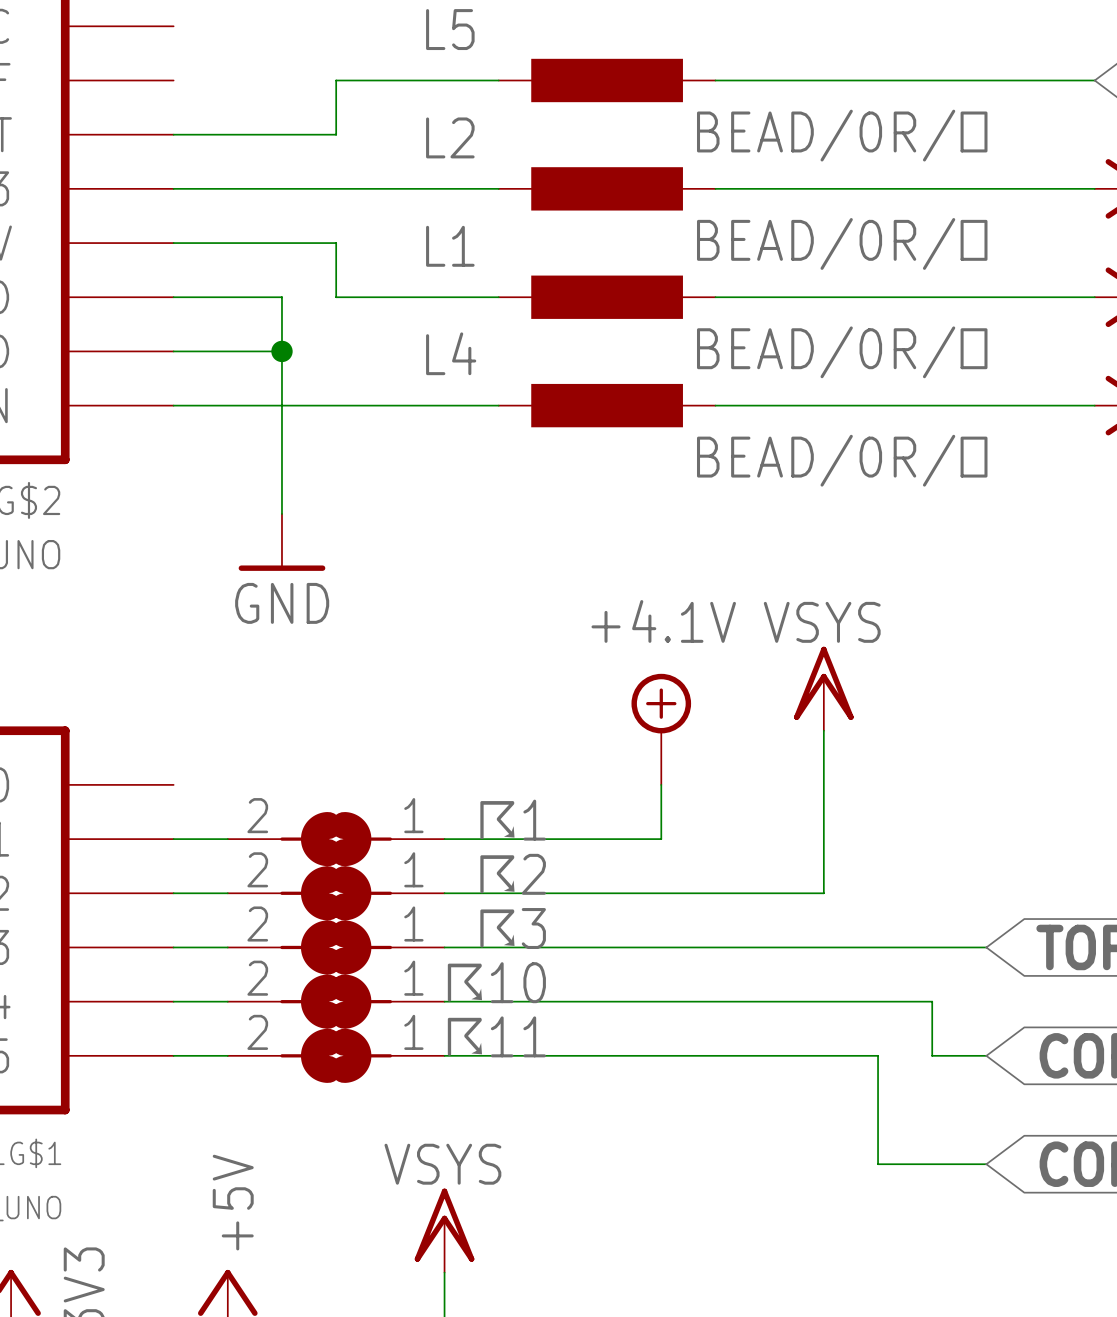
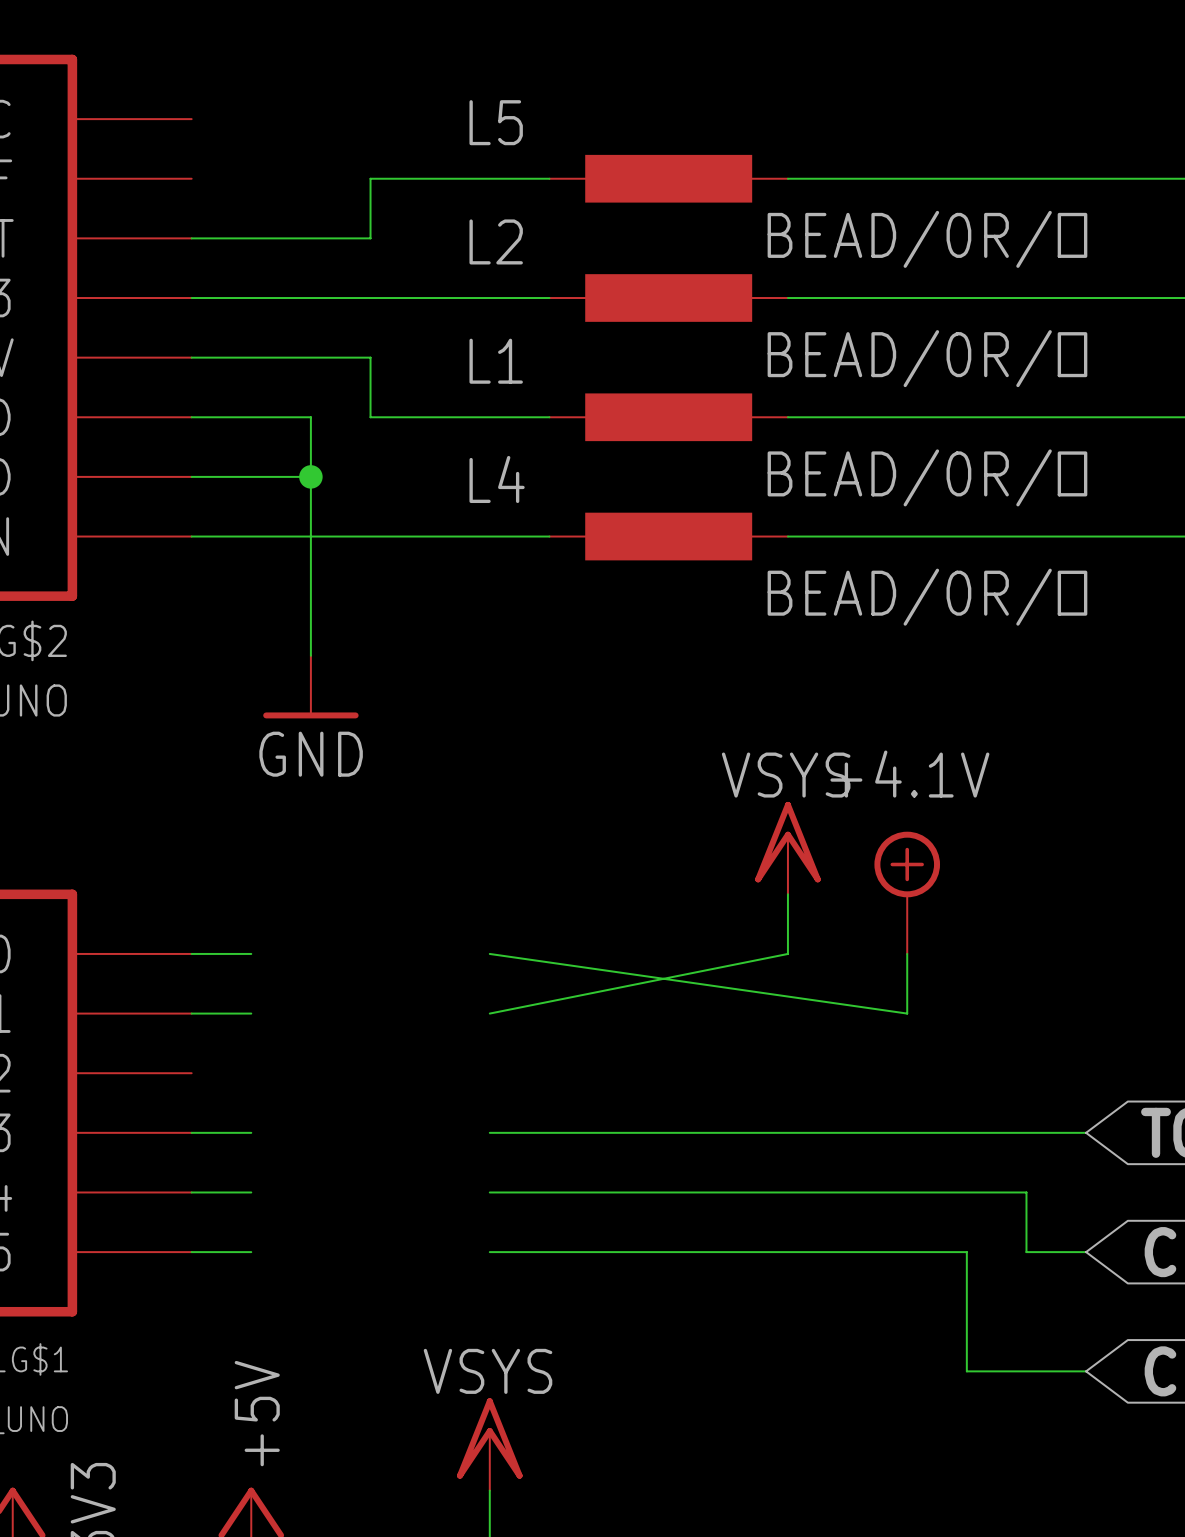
power symbol position: VSYS (823, 688) -> VSYS (787, 848)
power symbol position: +4.1V (661, 729) -> +4.1V (907, 892)
wire: (661, 784) (661, 839) (444, 839) -> (787, 894) (787, 953) (489, 1013)
☈1: (336, 839) -> none
wire: (823, 839) (823, 893) (444, 893) -> (907, 1013) (489, 953)
wire: (173, 893) (227, 893) -> (191, 953) (251, 953)
☈2: (336, 893) -> none
☈3: (336, 947) -> none
☈10: (336, 1001) -> none
☈11: (336, 1055) -> none

